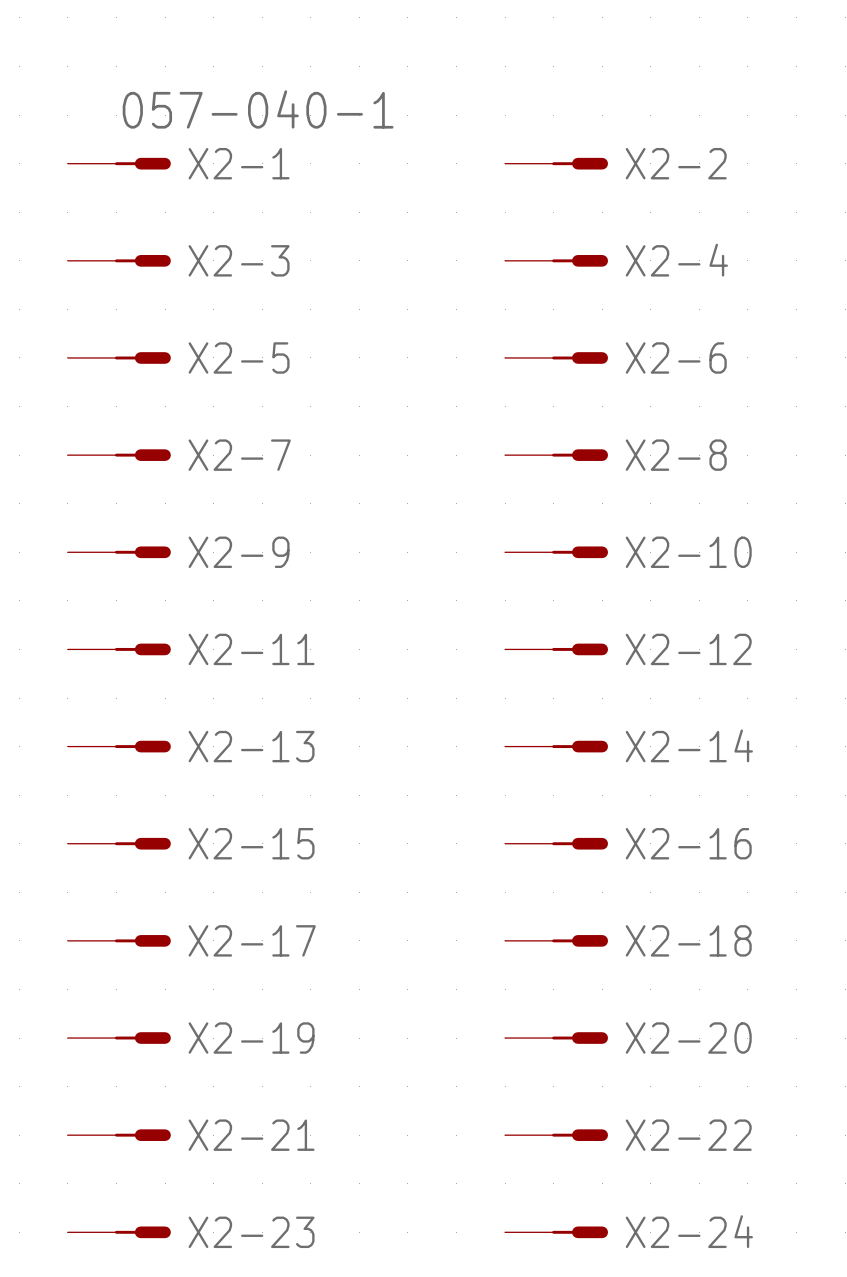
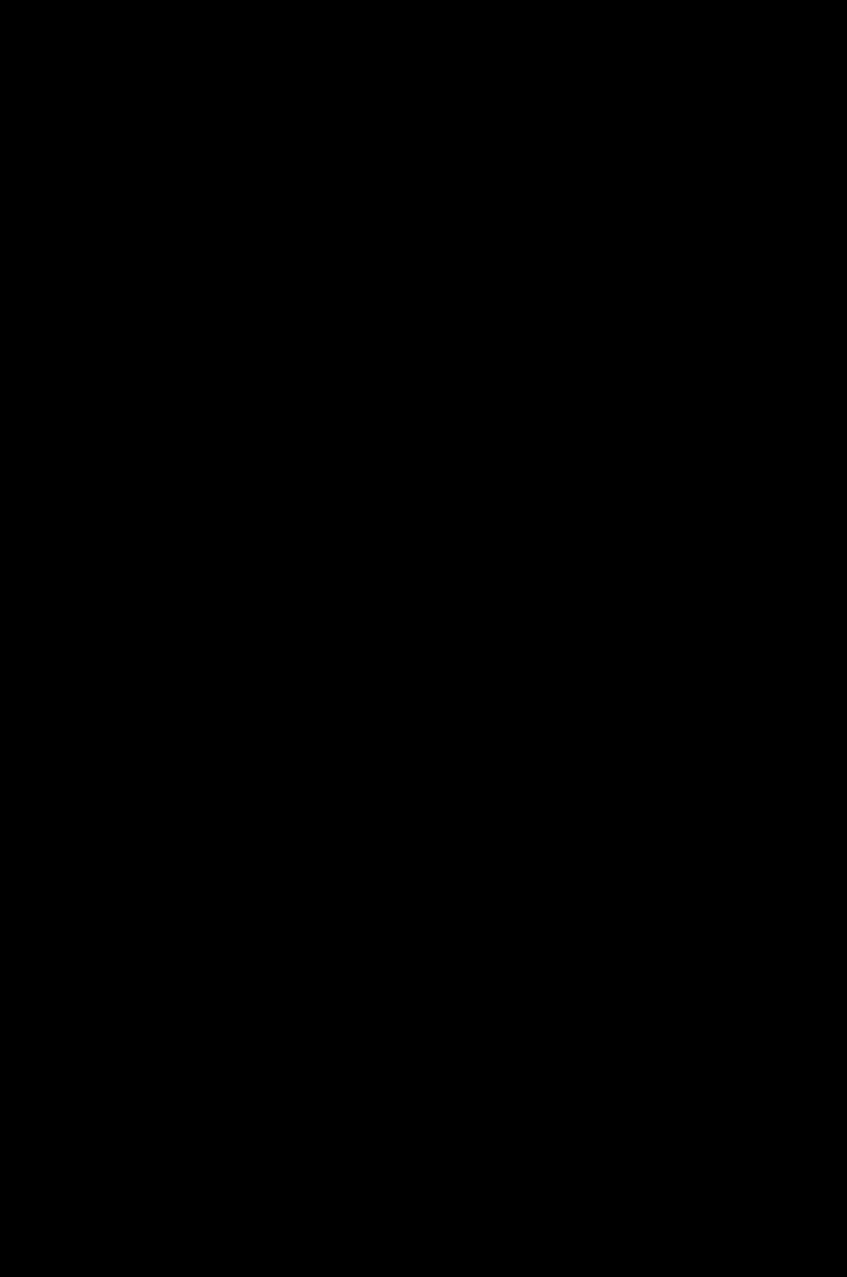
X2-1: 057-040-1 (119, 163) -> none
X2-2: (556, 163) -> none
X2-3: (119, 260) -> none
X2-4: (556, 260) -> none
X2-5: (119, 357) -> none
X2-6: (556, 357) -> none
X2-7: (119, 455) -> none
X2-8: (556, 455) -> none
X2-9: (119, 552) -> none
X2-10: (556, 552) -> none
X2-11: (119, 649) -> none
X2-12: (556, 649) -> none
X2-13: (119, 746) -> none
X2-14: (556, 746) -> none
X2-15: (119, 843) -> none
X2-16: (556, 843) -> none
X2-17: (119, 940) -> none
X2-18: (556, 940) -> none
X2-19: (119, 1038) -> none
X2-20: (556, 1038) -> none
X2-21: (119, 1135) -> none
X2-22: (556, 1135) -> none
X2-23: (119, 1232) -> none
X2-24: (556, 1232) -> none

